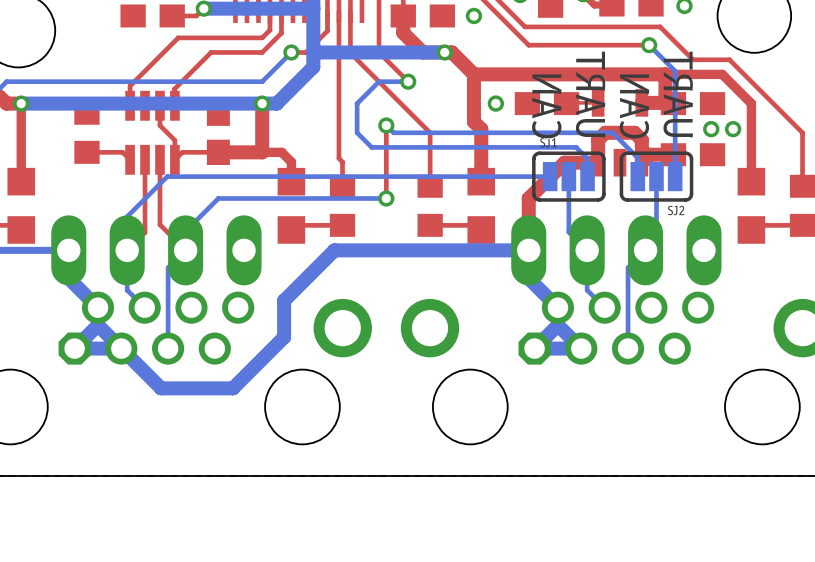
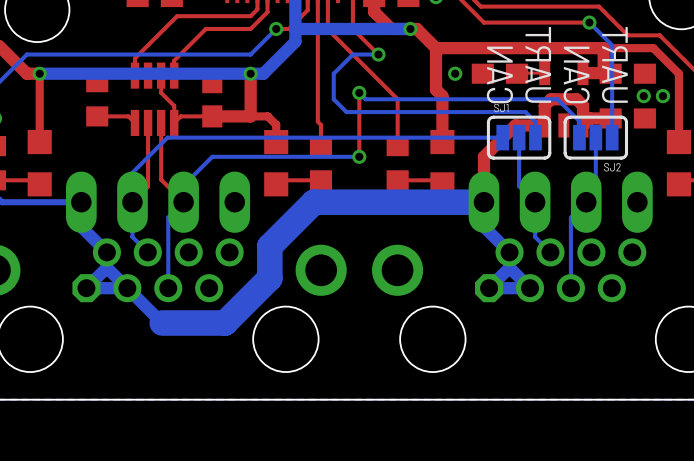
bottom track width: thin (528, 250) (334, 250) (284, 300) (284, 337) (232, 388) (161, 388) -> thick (483, 202) (313, 202) (269, 246) (269, 278) (225, 323) (162, 323)

